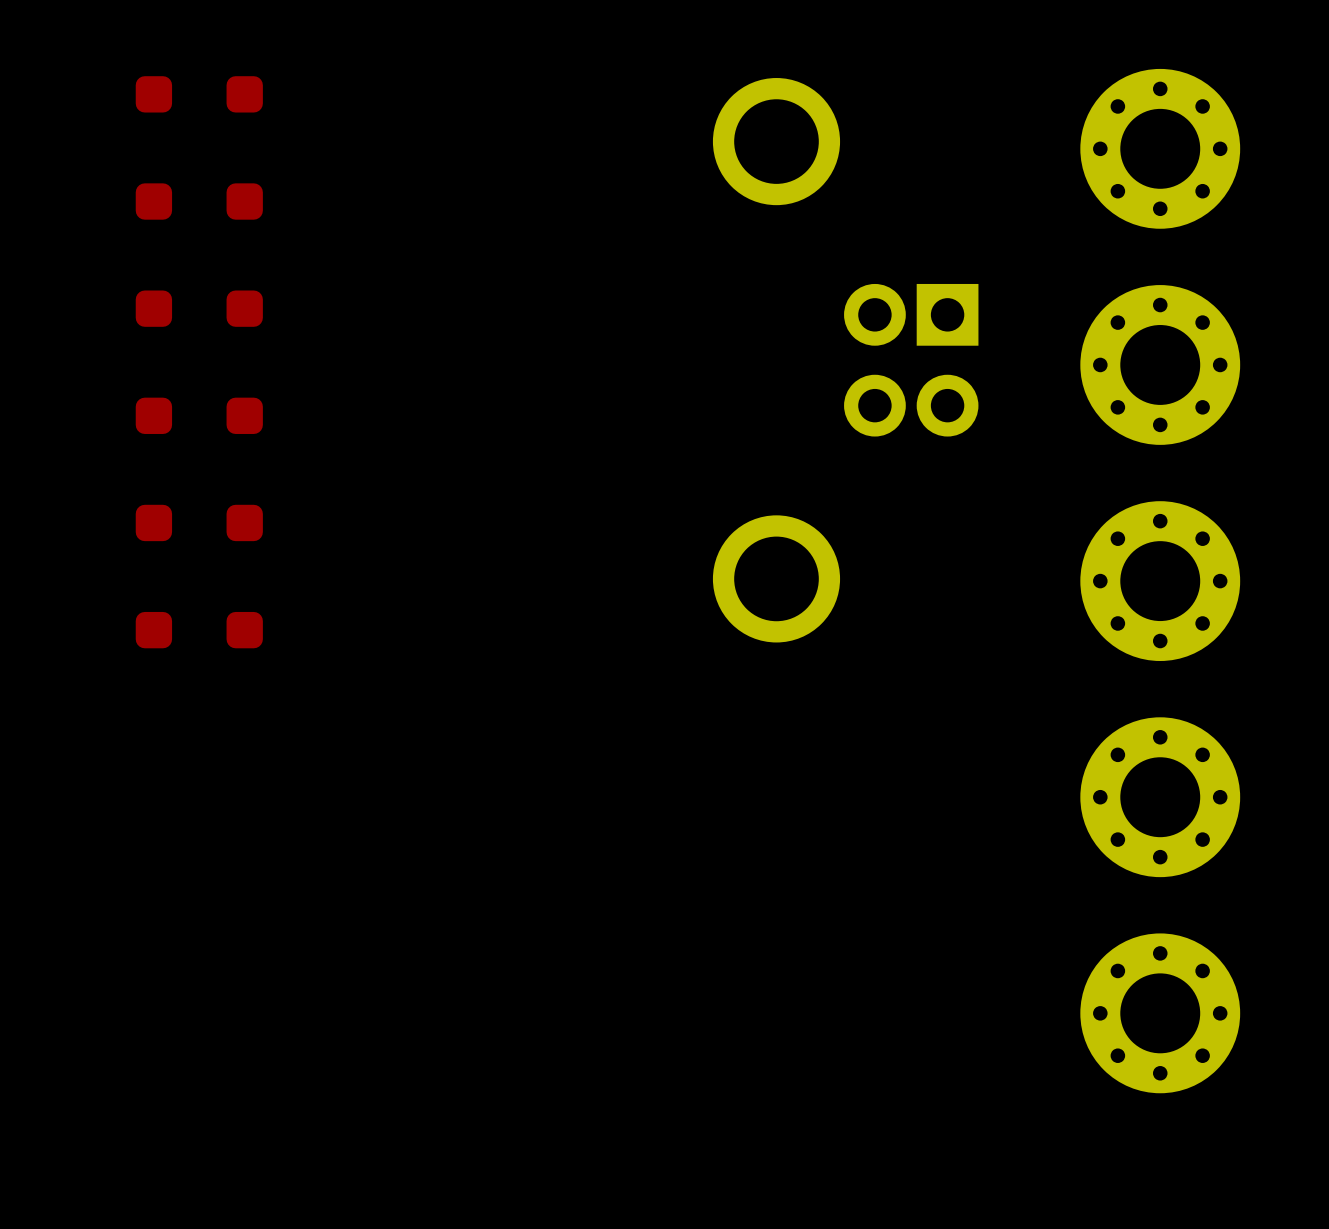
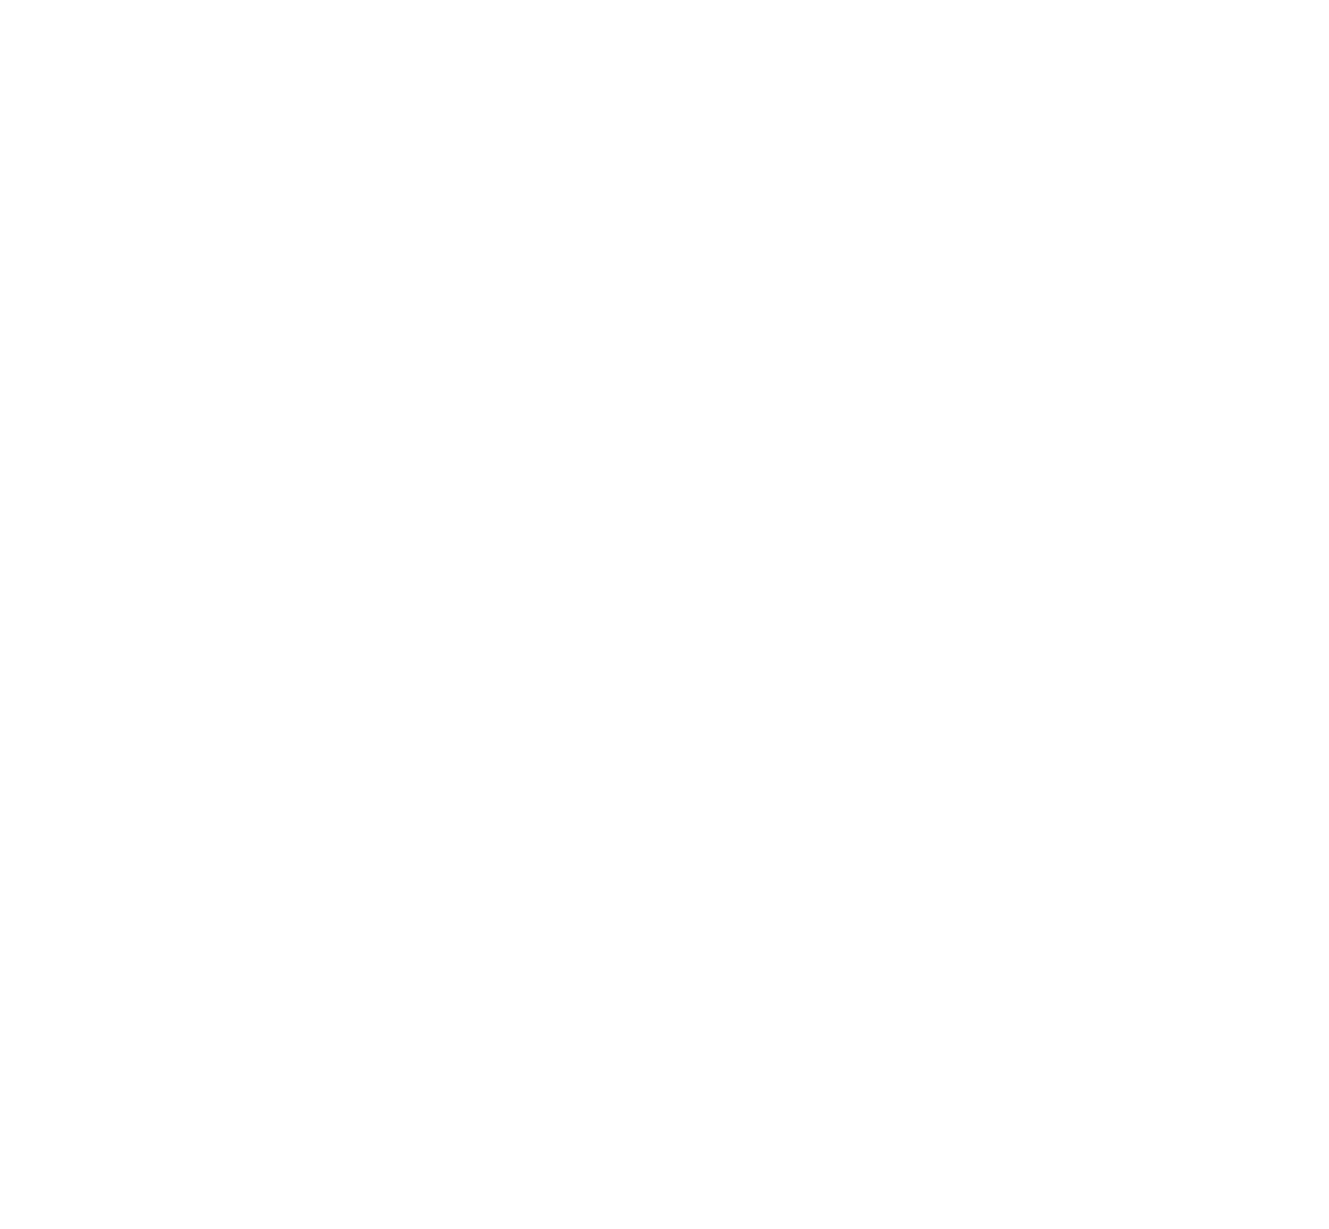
part: (199, 94) -> none
part: (1160, 148) -> none
part: (199, 201) -> none
part: (199, 308) -> none
part: (845, 360) -> none
part: (1160, 364) -> none
part: (199, 415) -> none
part: (199, 522) -> none
part: (1160, 581) -> none
part: (199, 630) -> none
part: (1160, 797) -> none
part: (1160, 1013) -> none

